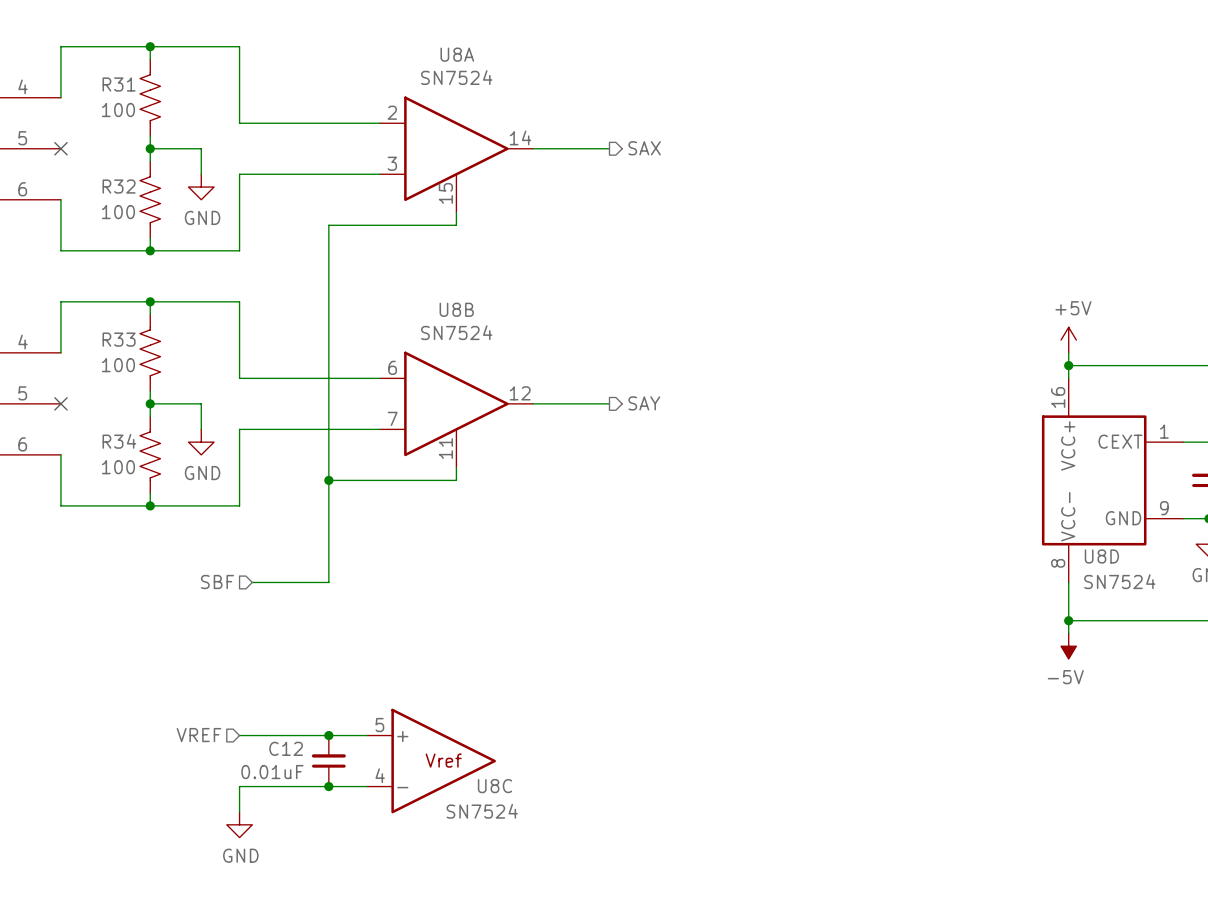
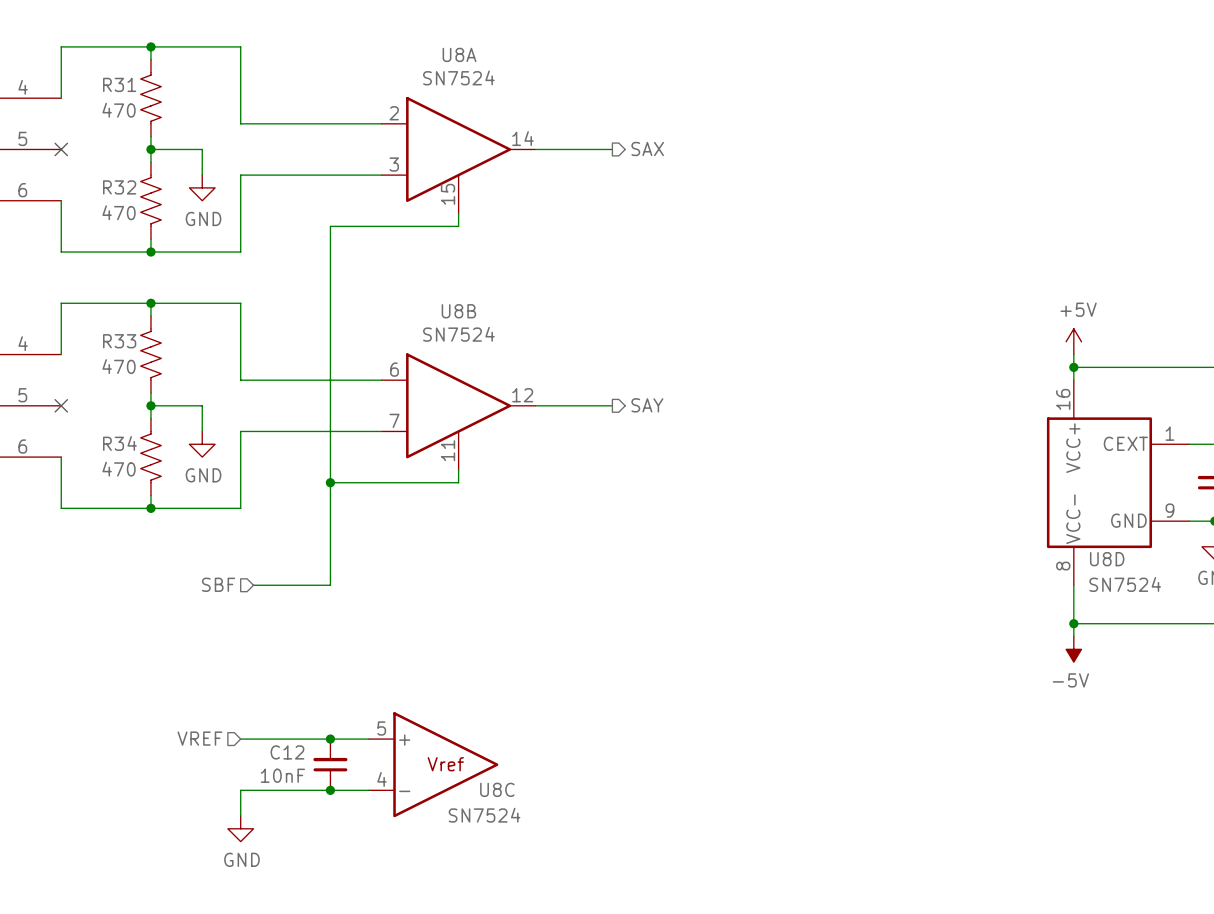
R31 value: 100 (118, 110) -> 470 (119, 110)
R32 value: 100 (118, 212) -> 470 (119, 212)
R33 value: 100 (118, 365) -> 470 (119, 366)
R34 value: 100 (118, 467) -> 470 (119, 469)
C12 value: 0.01uF (272, 772) -> 10nF (282, 775)

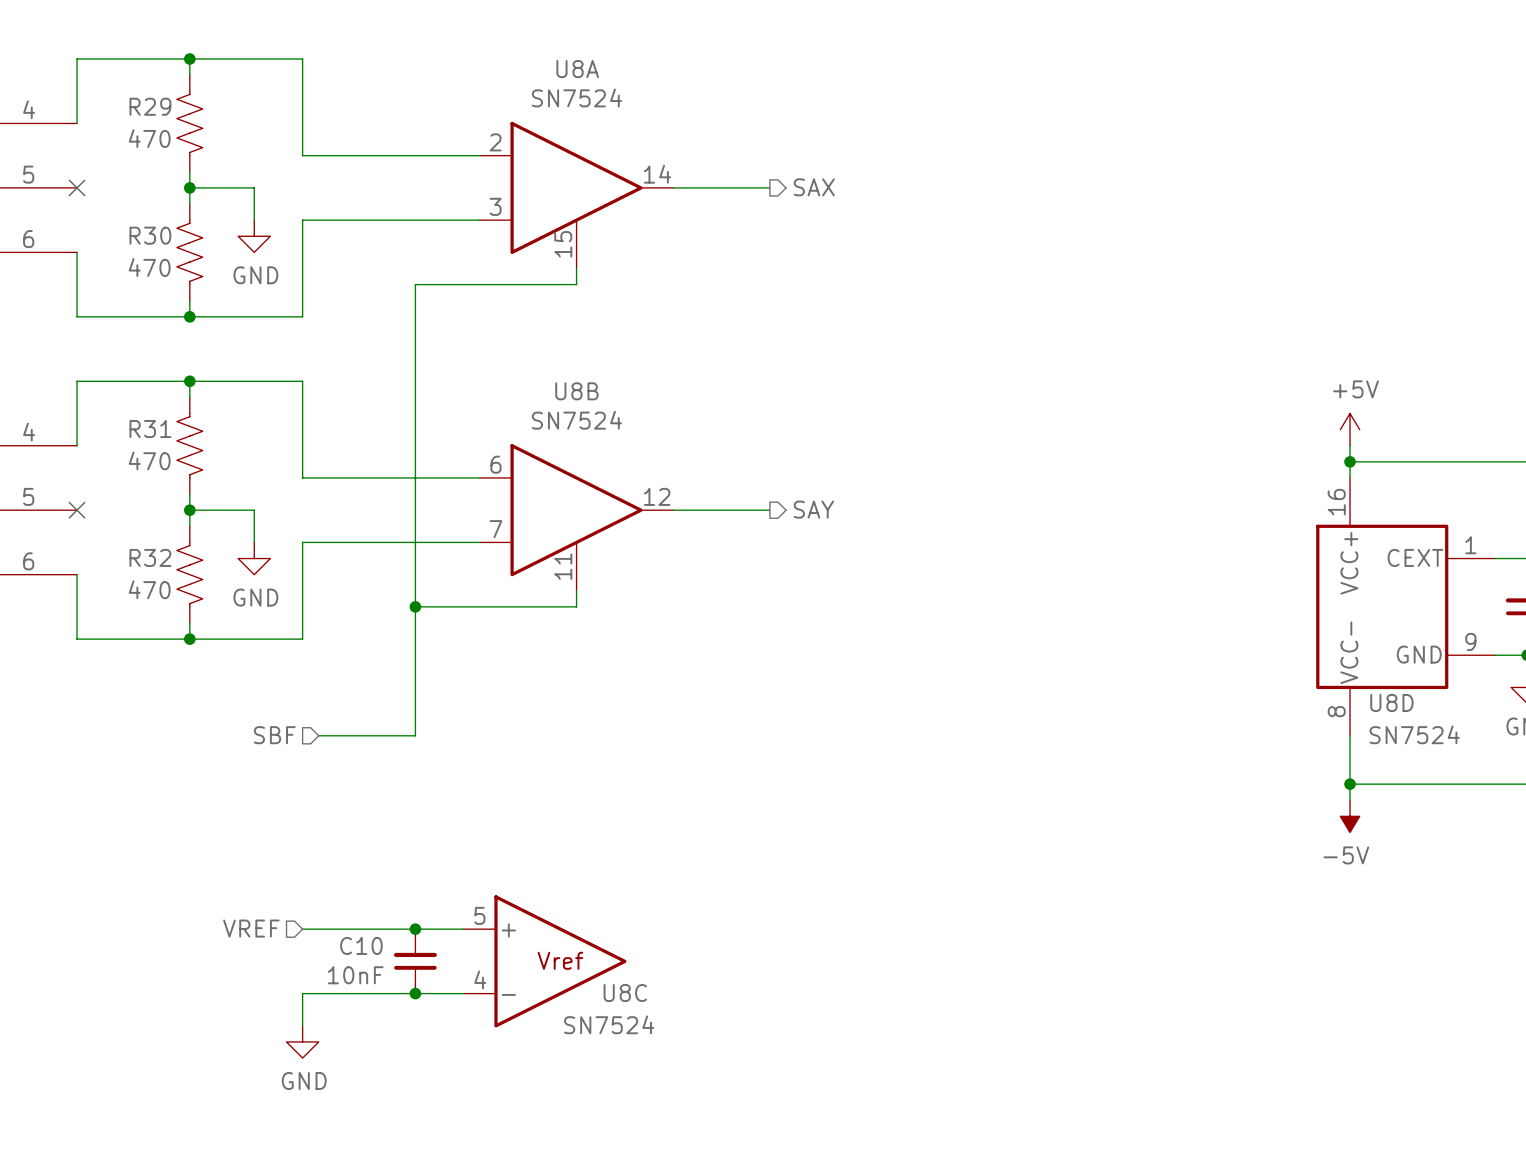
R31 name: R31 (119, 84) -> R29 (150, 106)
R32 name: R32 (119, 187) -> R30 (150, 235)
R33 name: R33 (119, 341) -> R31 (150, 429)
R34 name: R34 (119, 443) -> R32 (150, 557)
C12 name: C12 (287, 752) -> C10 (361, 945)

